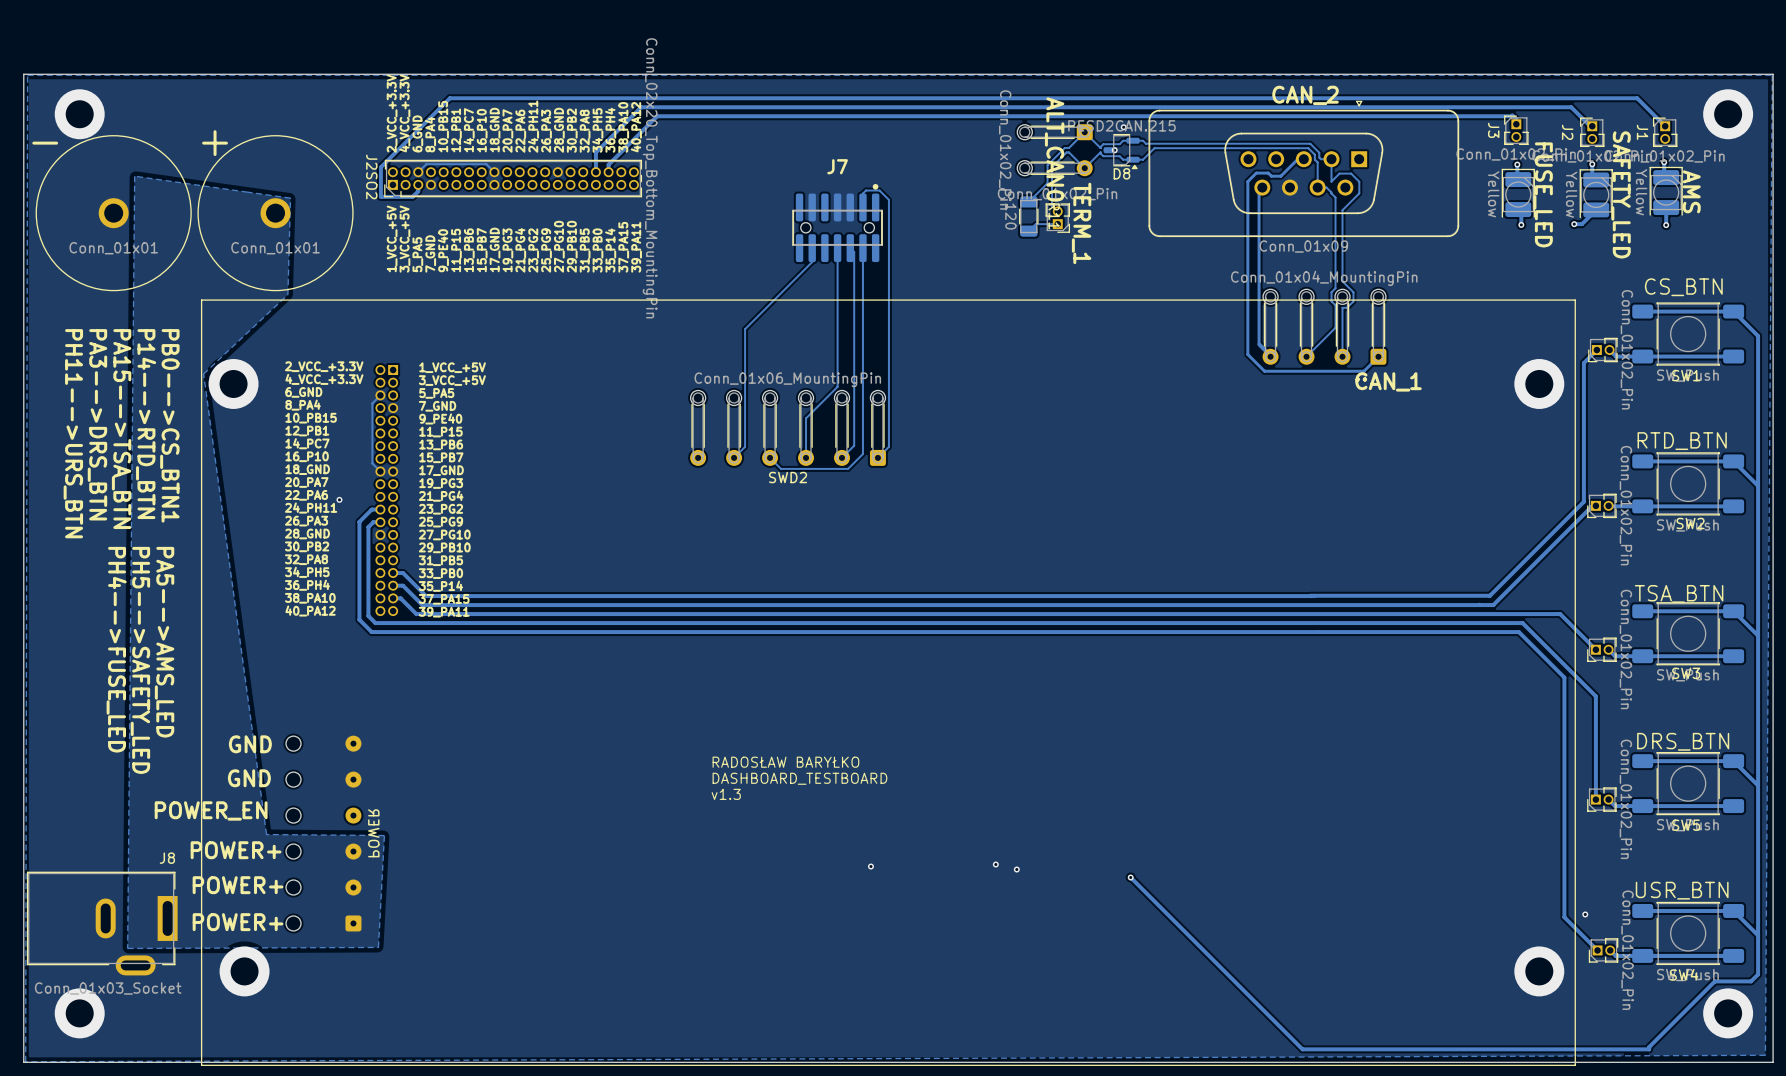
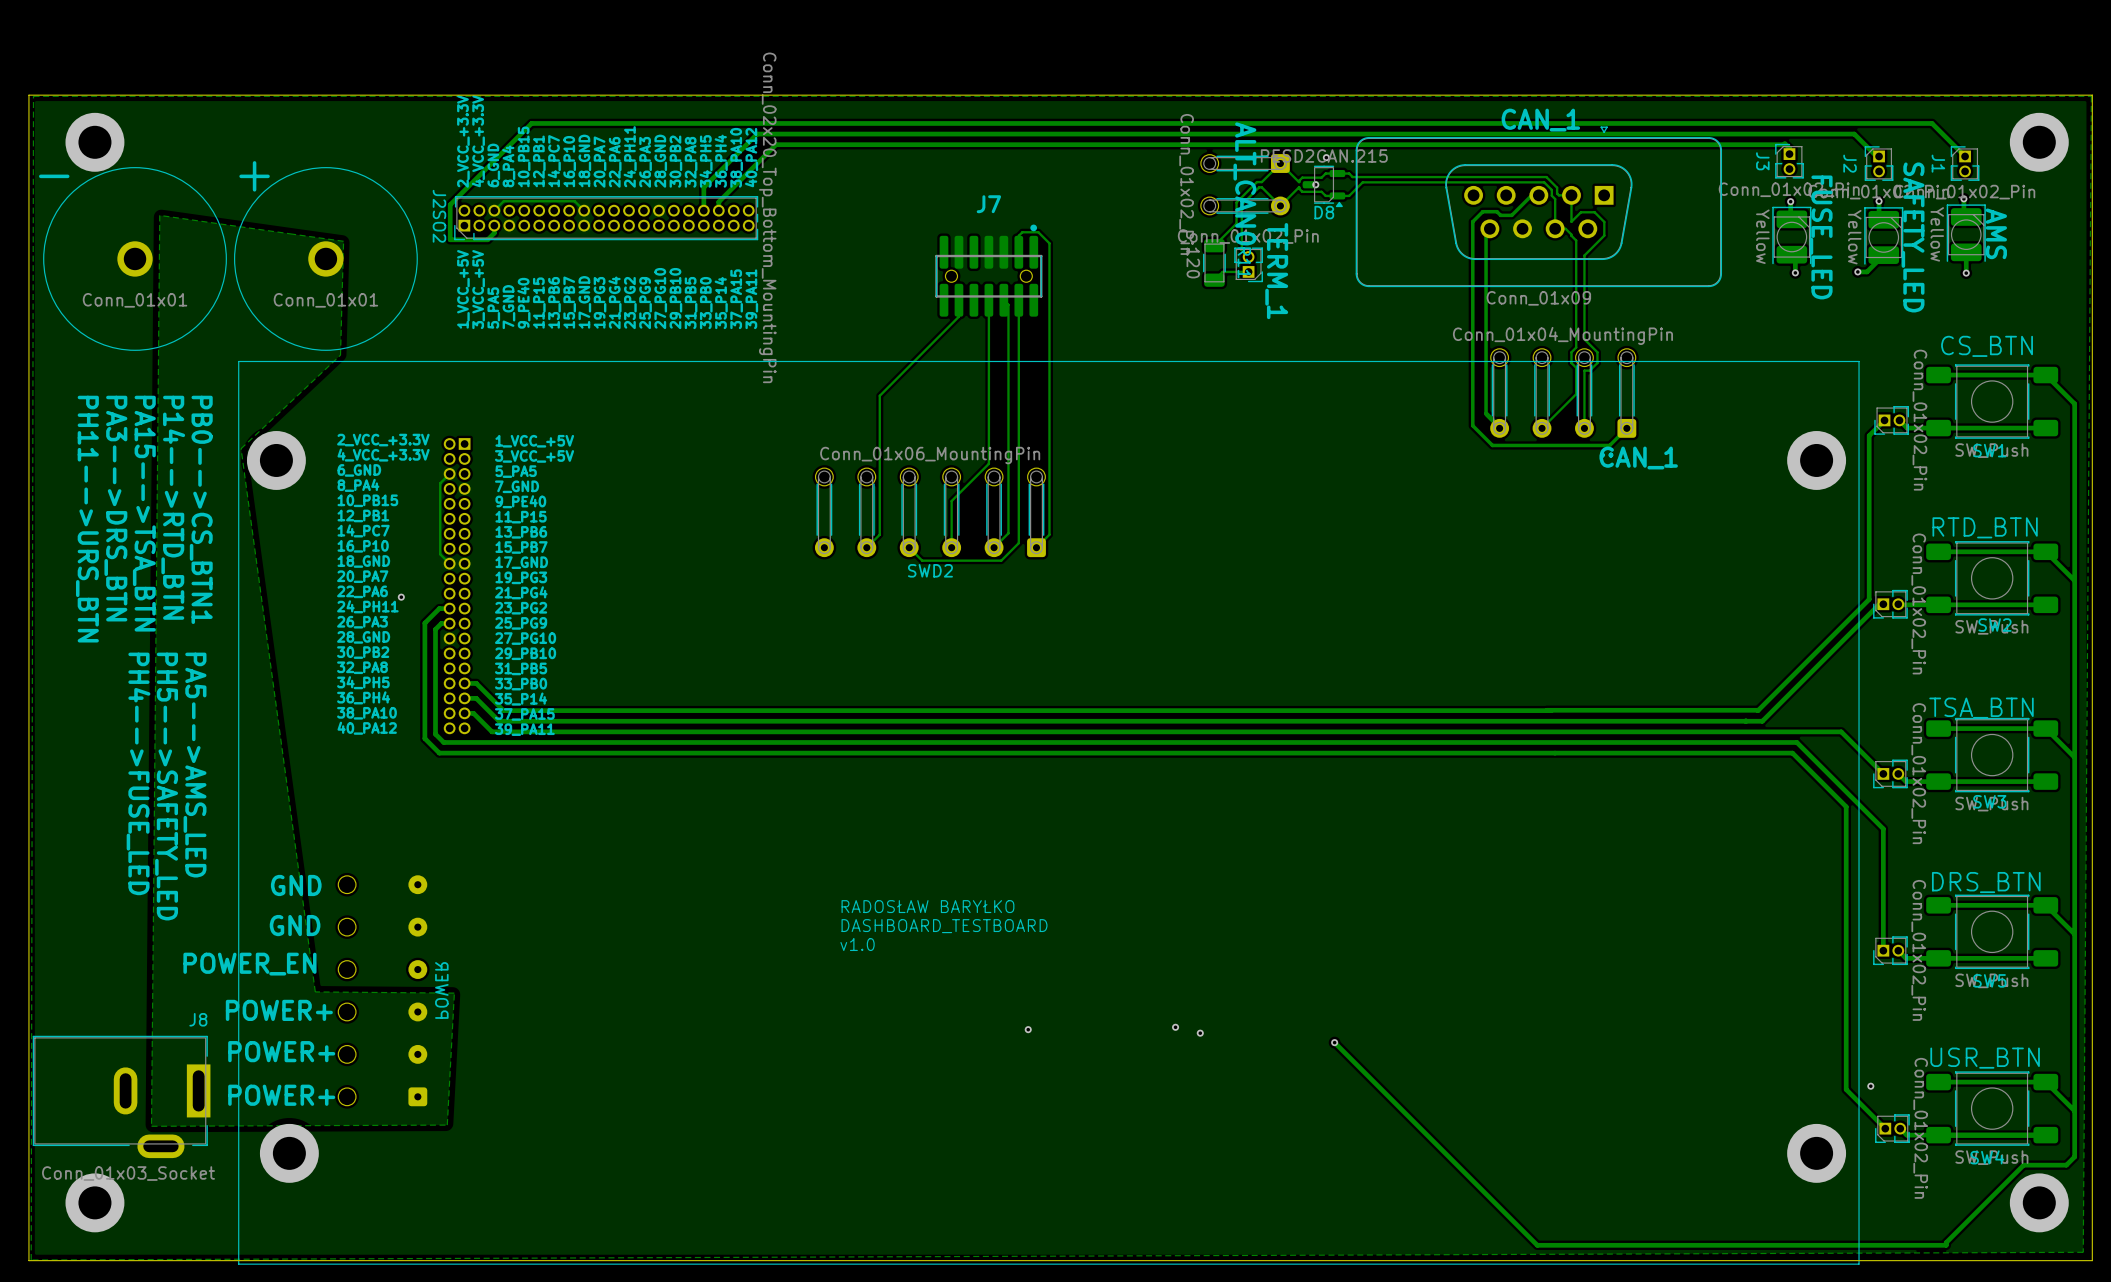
CAN_2 name: CAN_2 (1305, 95) -> CAN_1 (1540, 120)
text: v1.3 (726, 794) -> v1.0 (857, 944)

